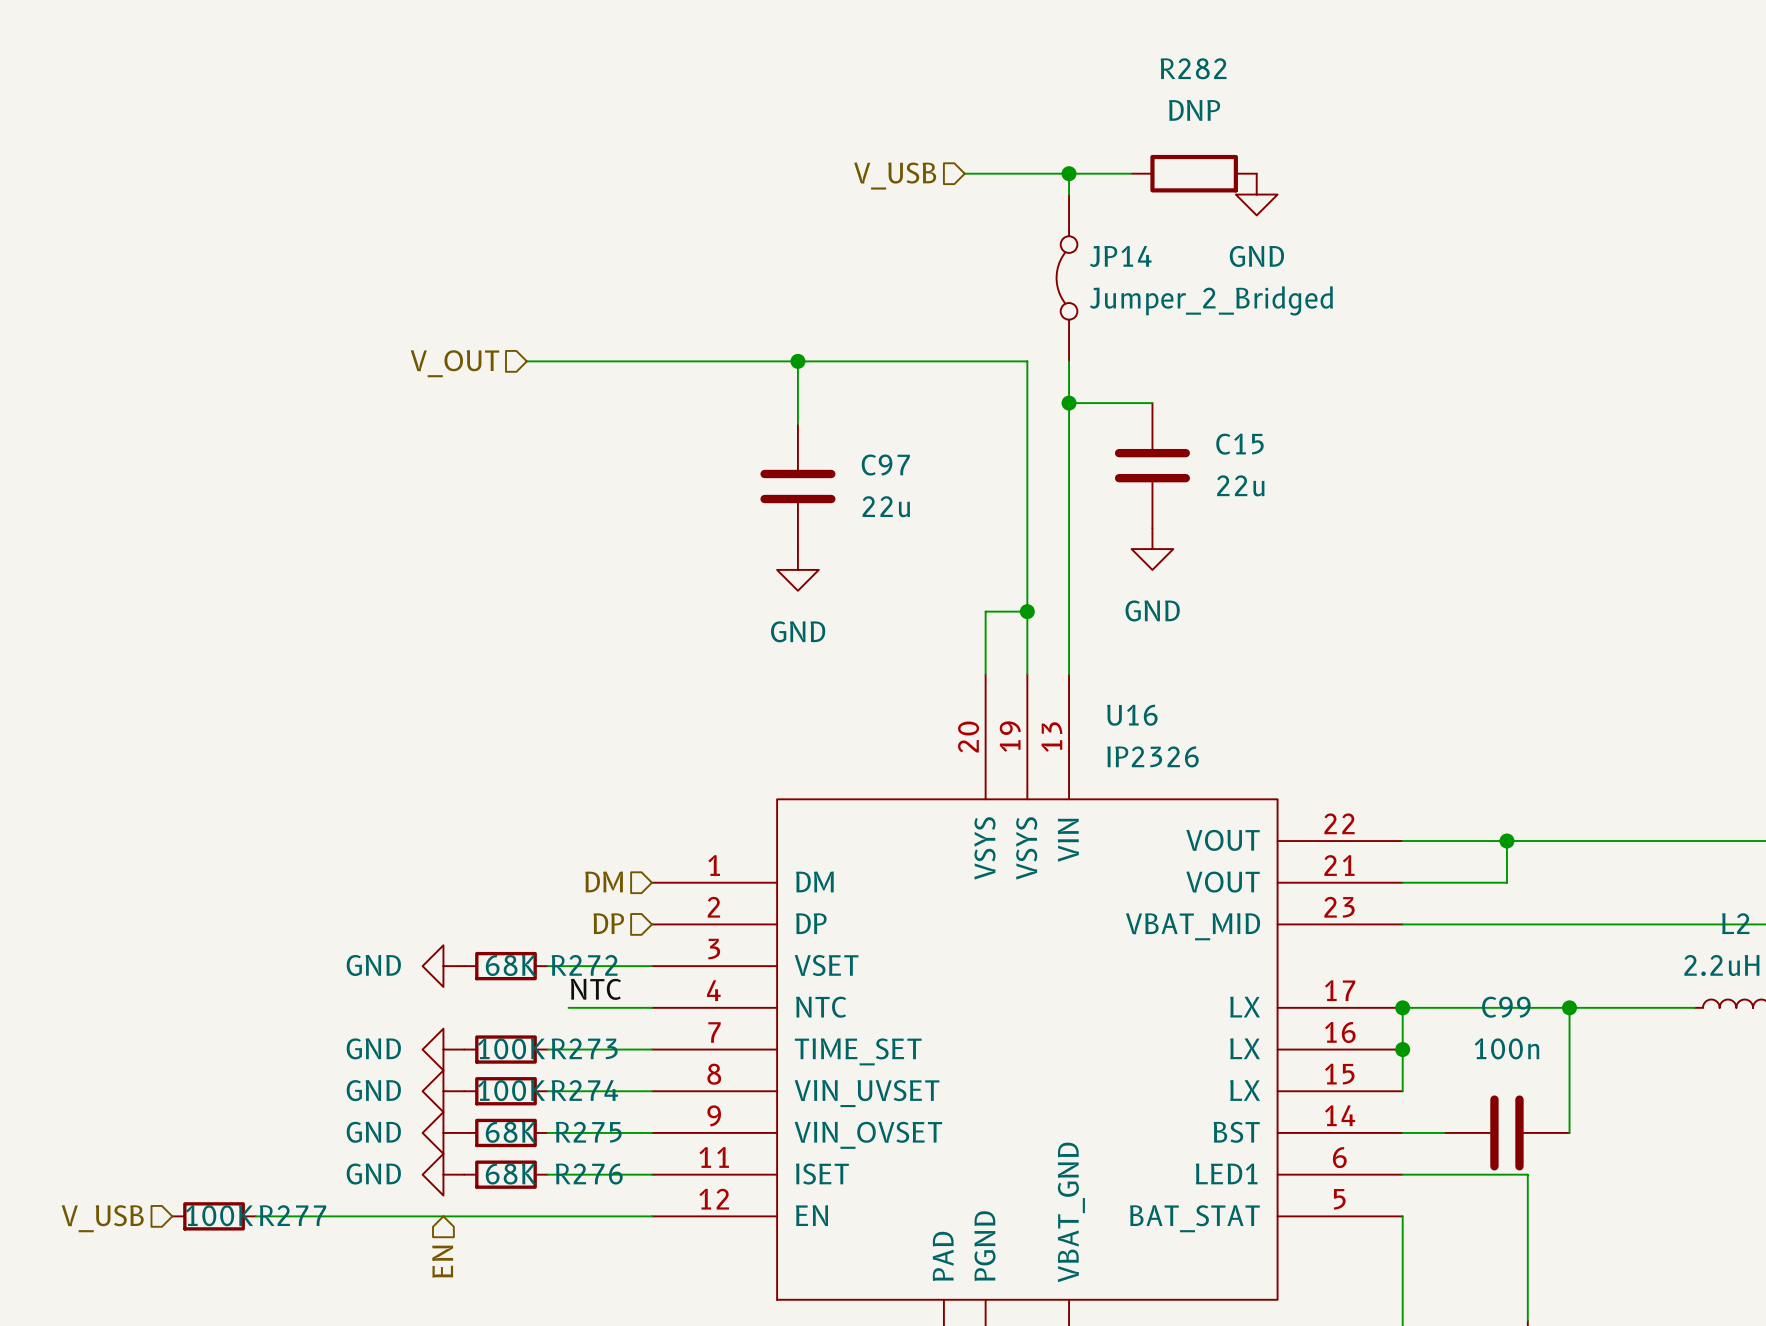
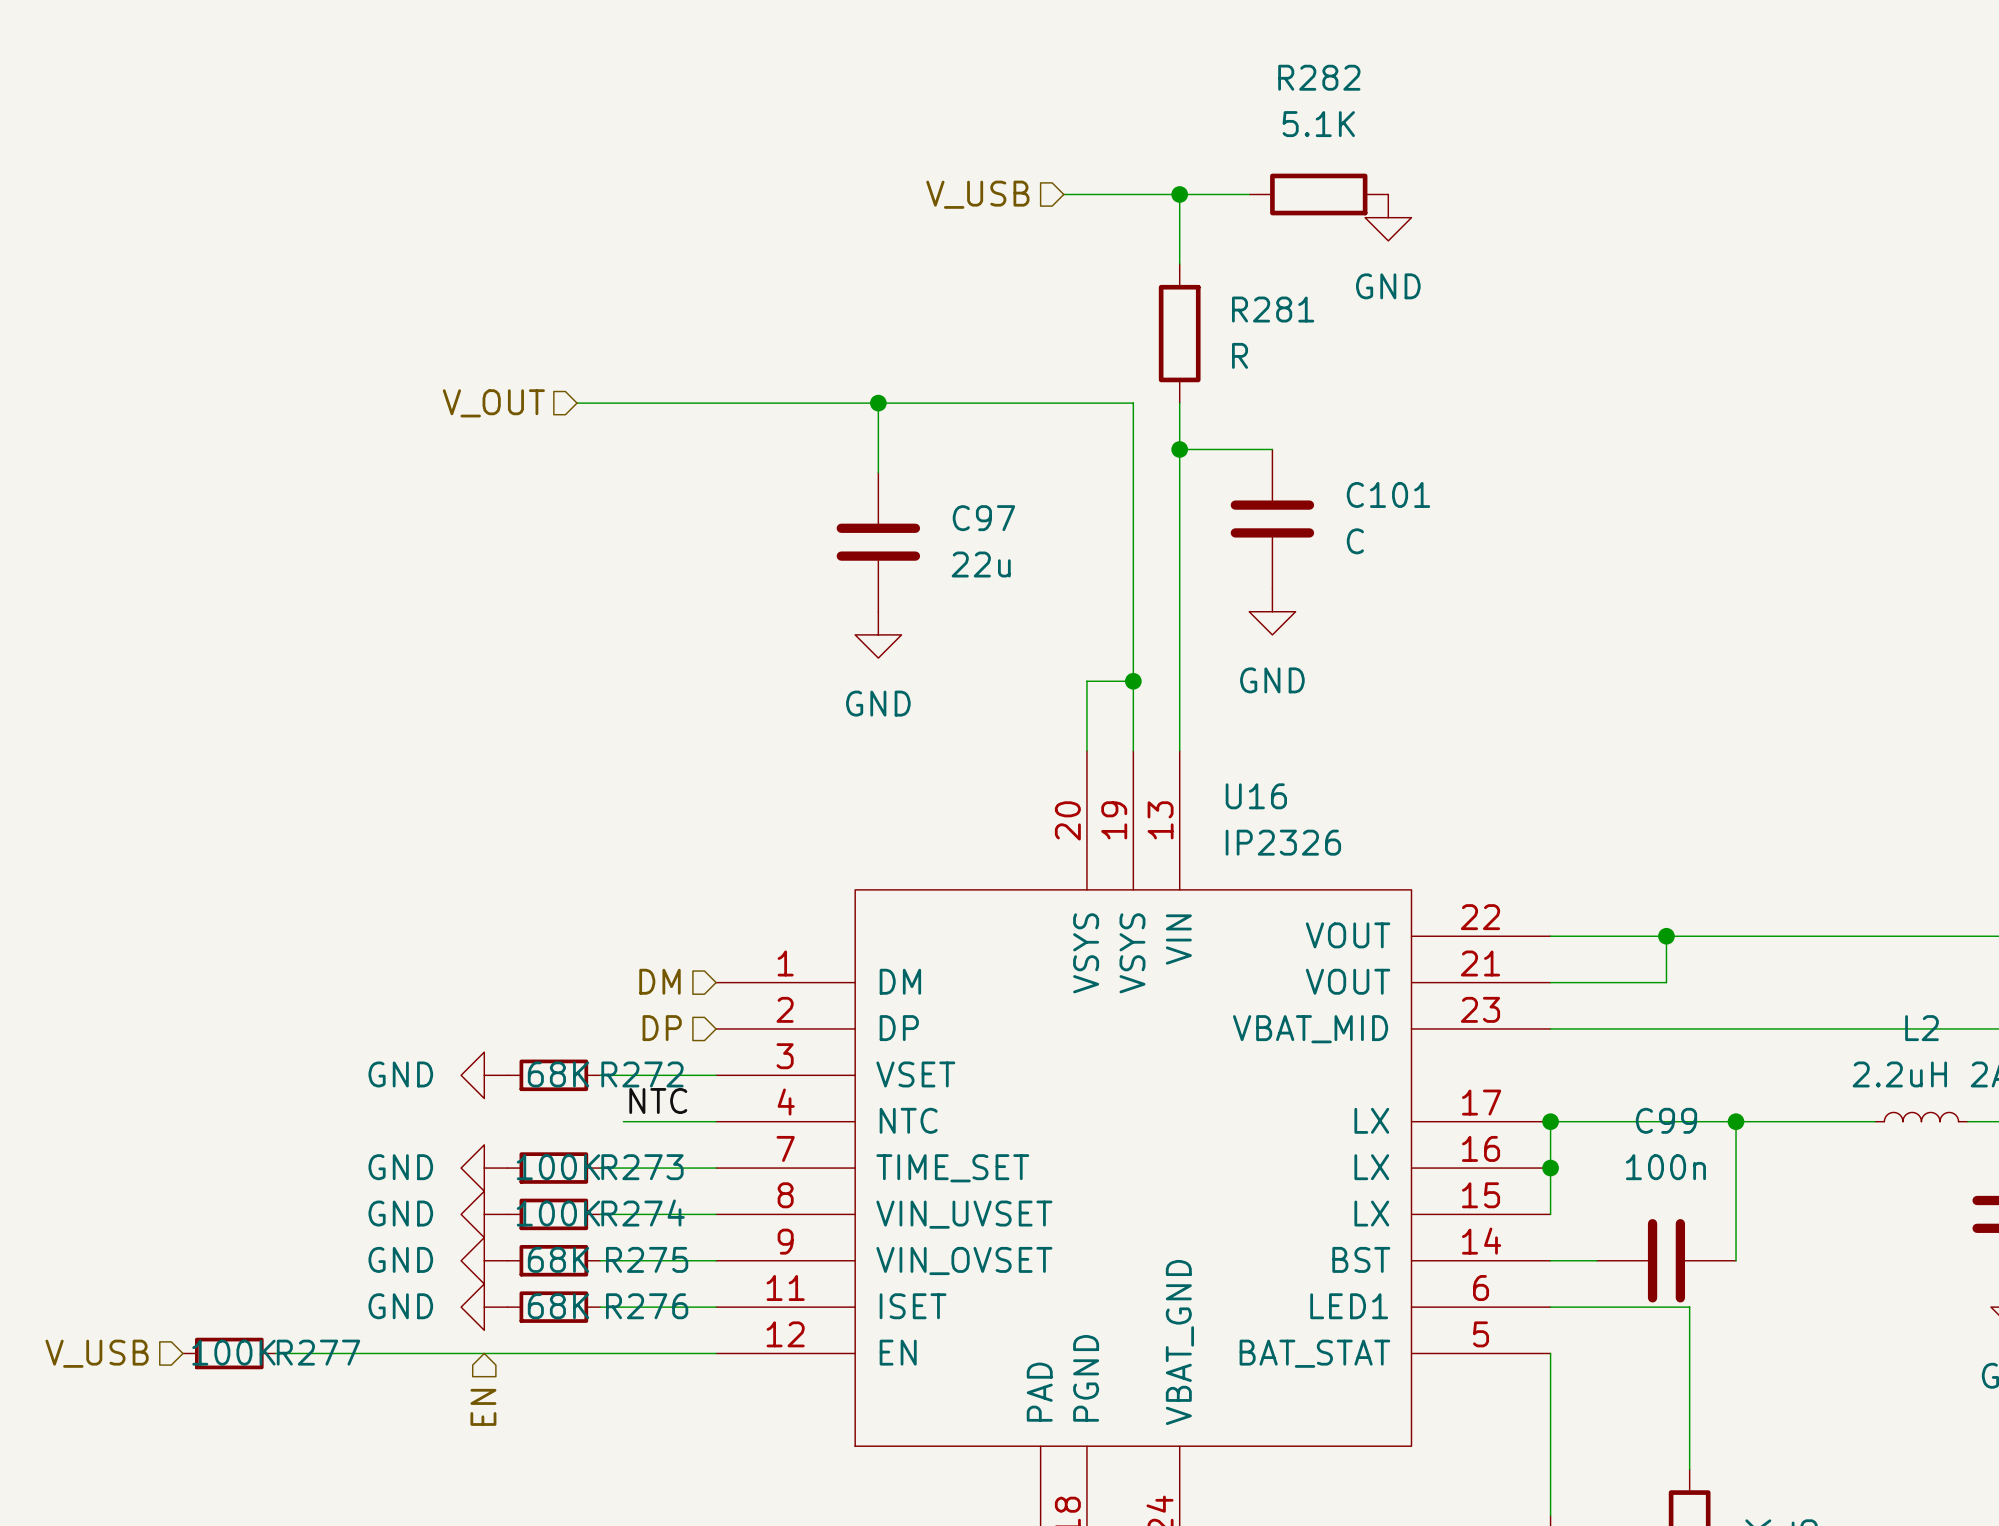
R282 value: DNP (1194, 110) -> 5.1K (1318, 124)
JP14: Jumper_2_Bridged (1066, 277) -> none
R281: none -> R (1179, 333)
C15 name: C15 (1239, 444) -> C101 (1388, 494)
C15 value: 22u (1240, 485) -> C (1355, 541)

